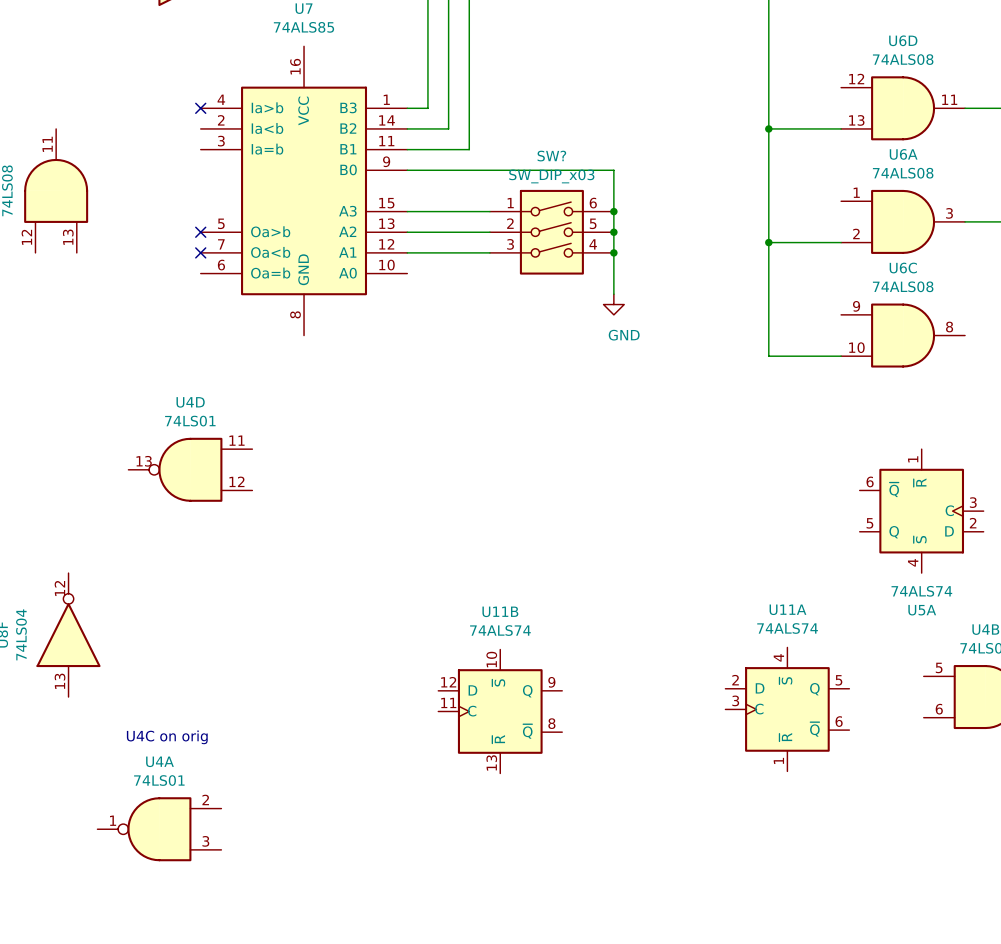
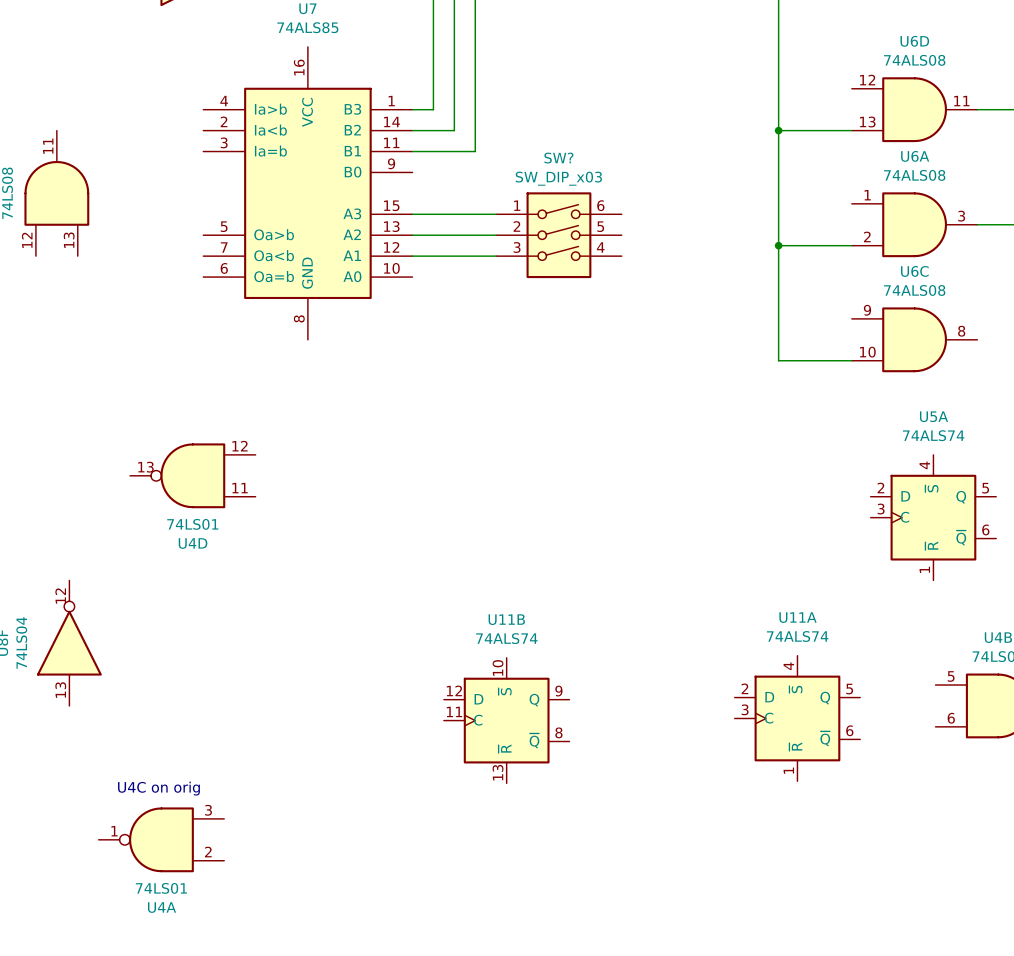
no-connect mark: (200, 108) -> none
wire: (407, 170) (613, 170) (613, 294) -> none
junction: (613, 211) -> none
no-connect mark: (200, 232) -> none
junction: (613, 232) -> none
no-connect mark: (200, 252) -> none
junction: (613, 252) -> none
power symbol: GND (613, 304) -> none
U4D flip: as is (190, 469) -> up-down (192, 475)
U5A rotation: 0° (921, 511) -> 180° (933, 517)
text position: U4C on orig (167, 737) -> U4C on orig (158, 788)
U4A flip: as is (159, 829) -> up-down (161, 839)

